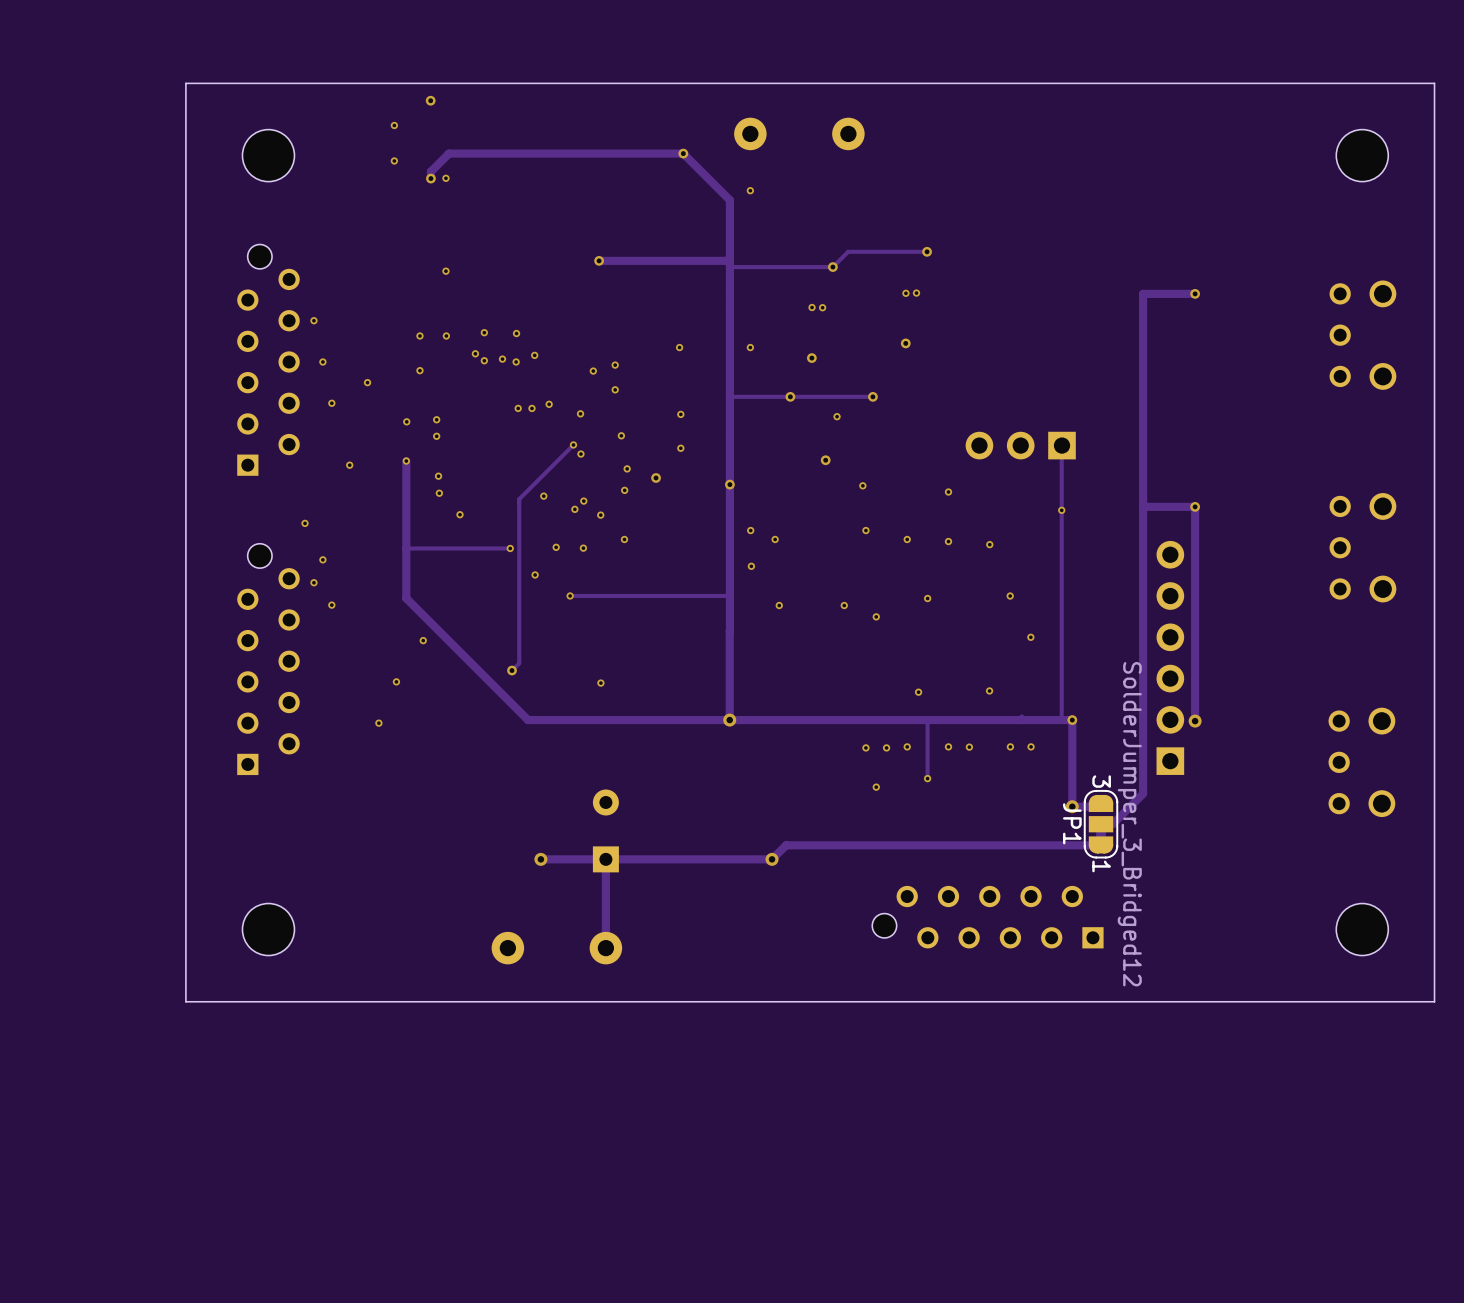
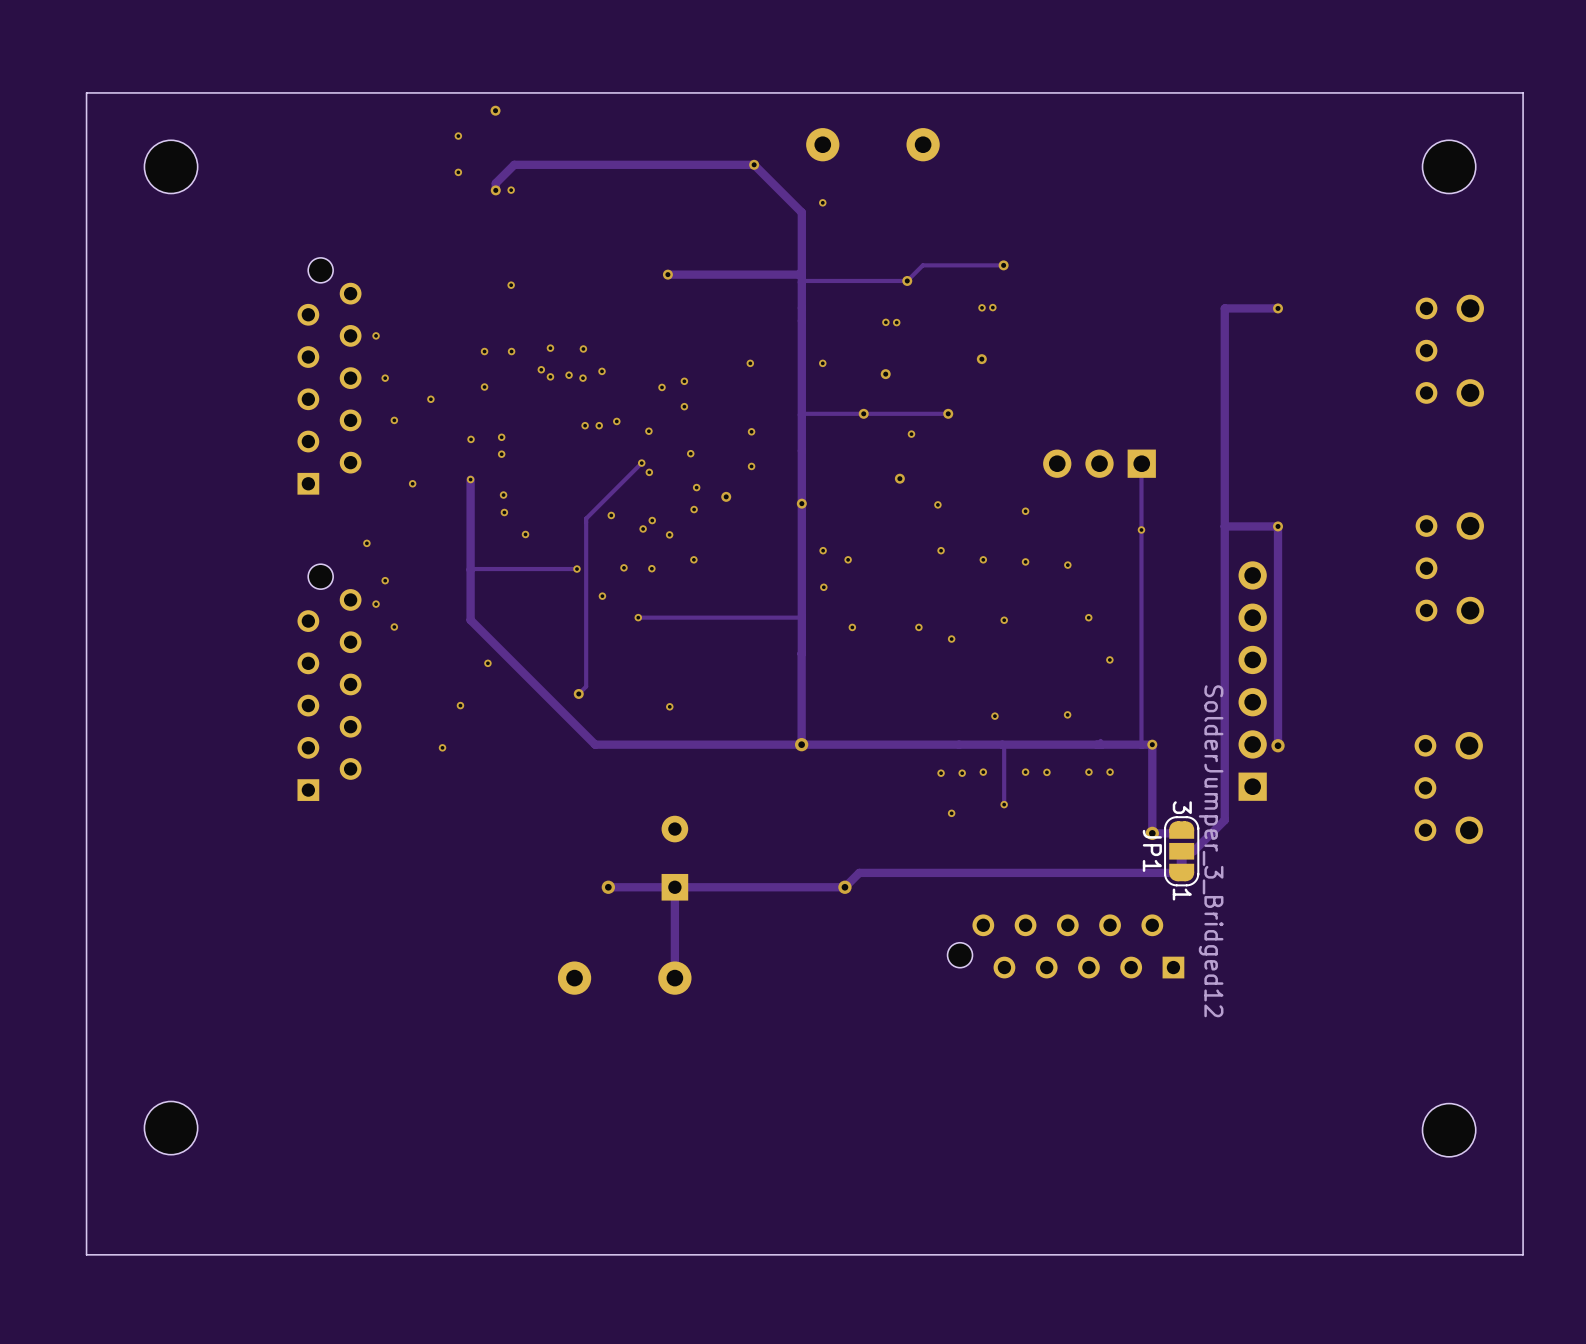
board edge: (185, 83) (185, 1001) (1434, 1001) -> (244, 92) (86, 92) (86, 1254) (1523, 1254) (1523, 1033)
part position: (268, 155) -> (171, 166)
part position: (268, 929) -> (171, 1128)
part position: (1362, 929) -> (1449, 1130)

